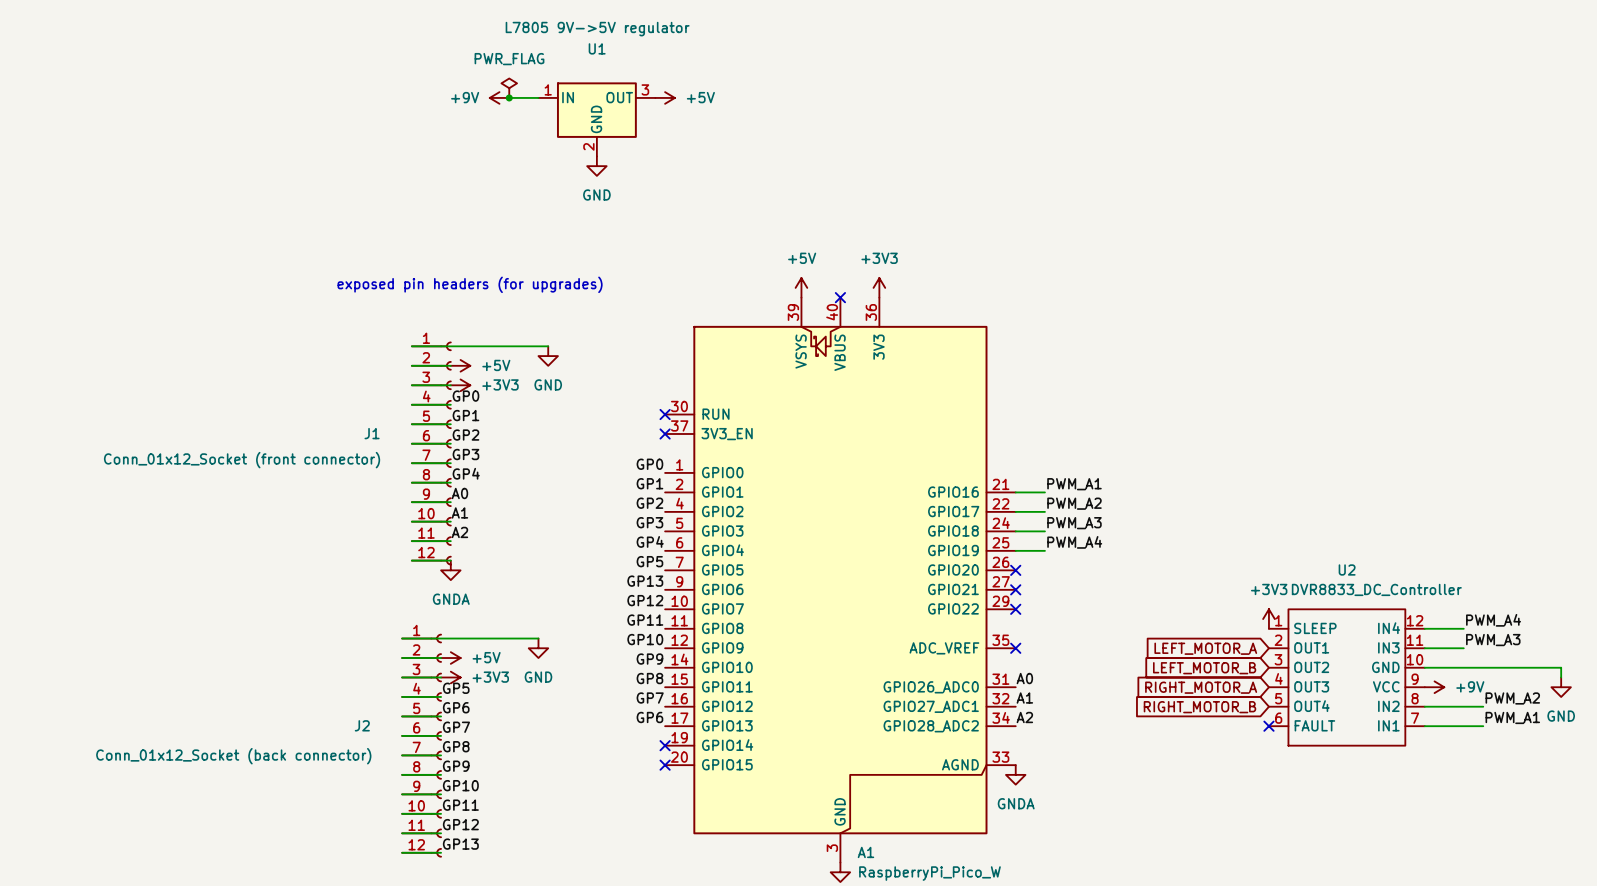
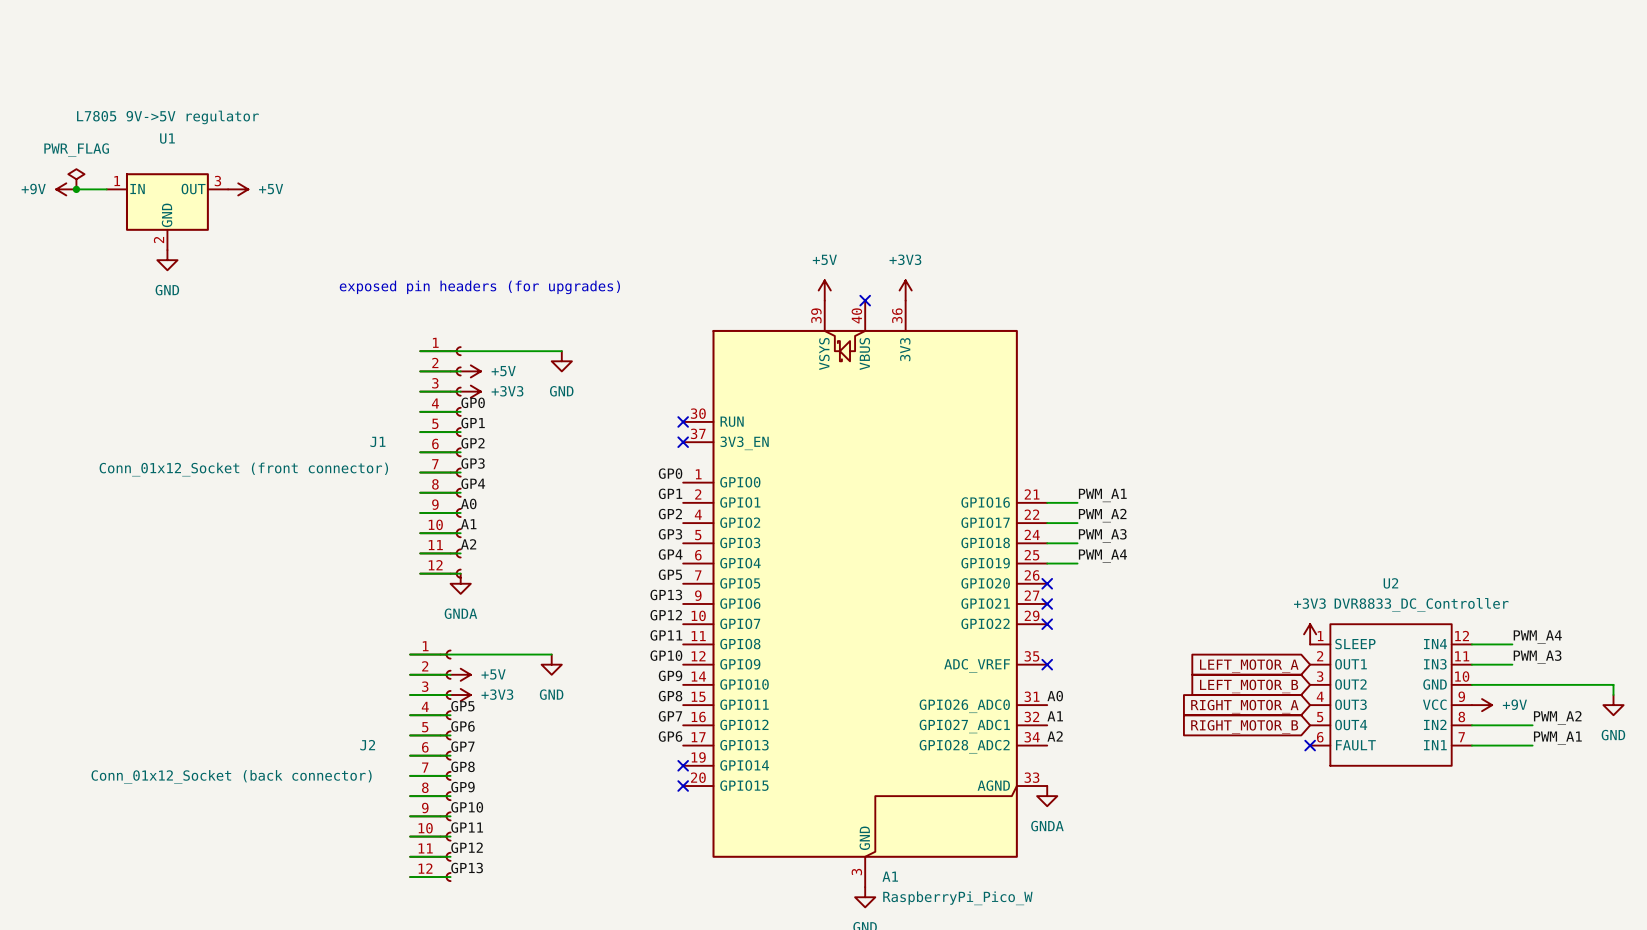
power symbol: PWR_FLAG (509, 88) -> none
power symbol: +9V (499, 97) -> none
wire: (509, 97) (538, 97) -> none
junction: (509, 97) -> none
power symbol: +5V (665, 97) -> none
U1 position: (596, 119) -> (167, 211)
power symbol: GND (596, 166) -> none
power symbol: none -> PWR_FLAG (76, 179)
power symbol: none -> +9V (66, 189)
wire: none -> (76, 189) (106, 189)
junction: none -> (76, 189)
power symbol: none -> +5V (238, 189)
power symbol: none -> GND (167, 260)

